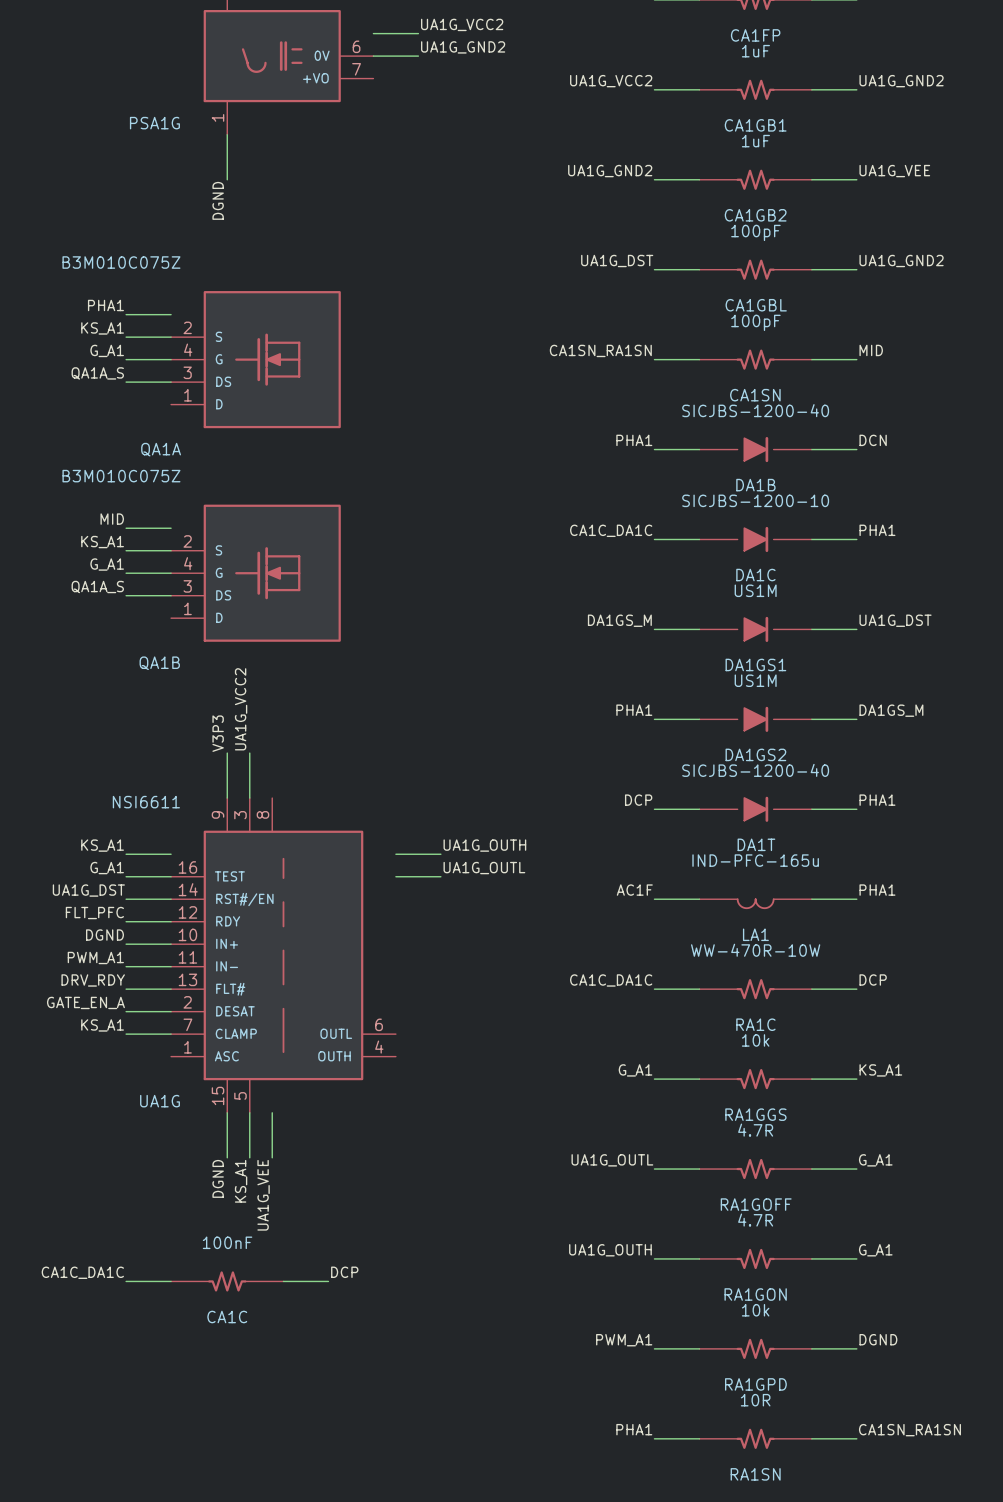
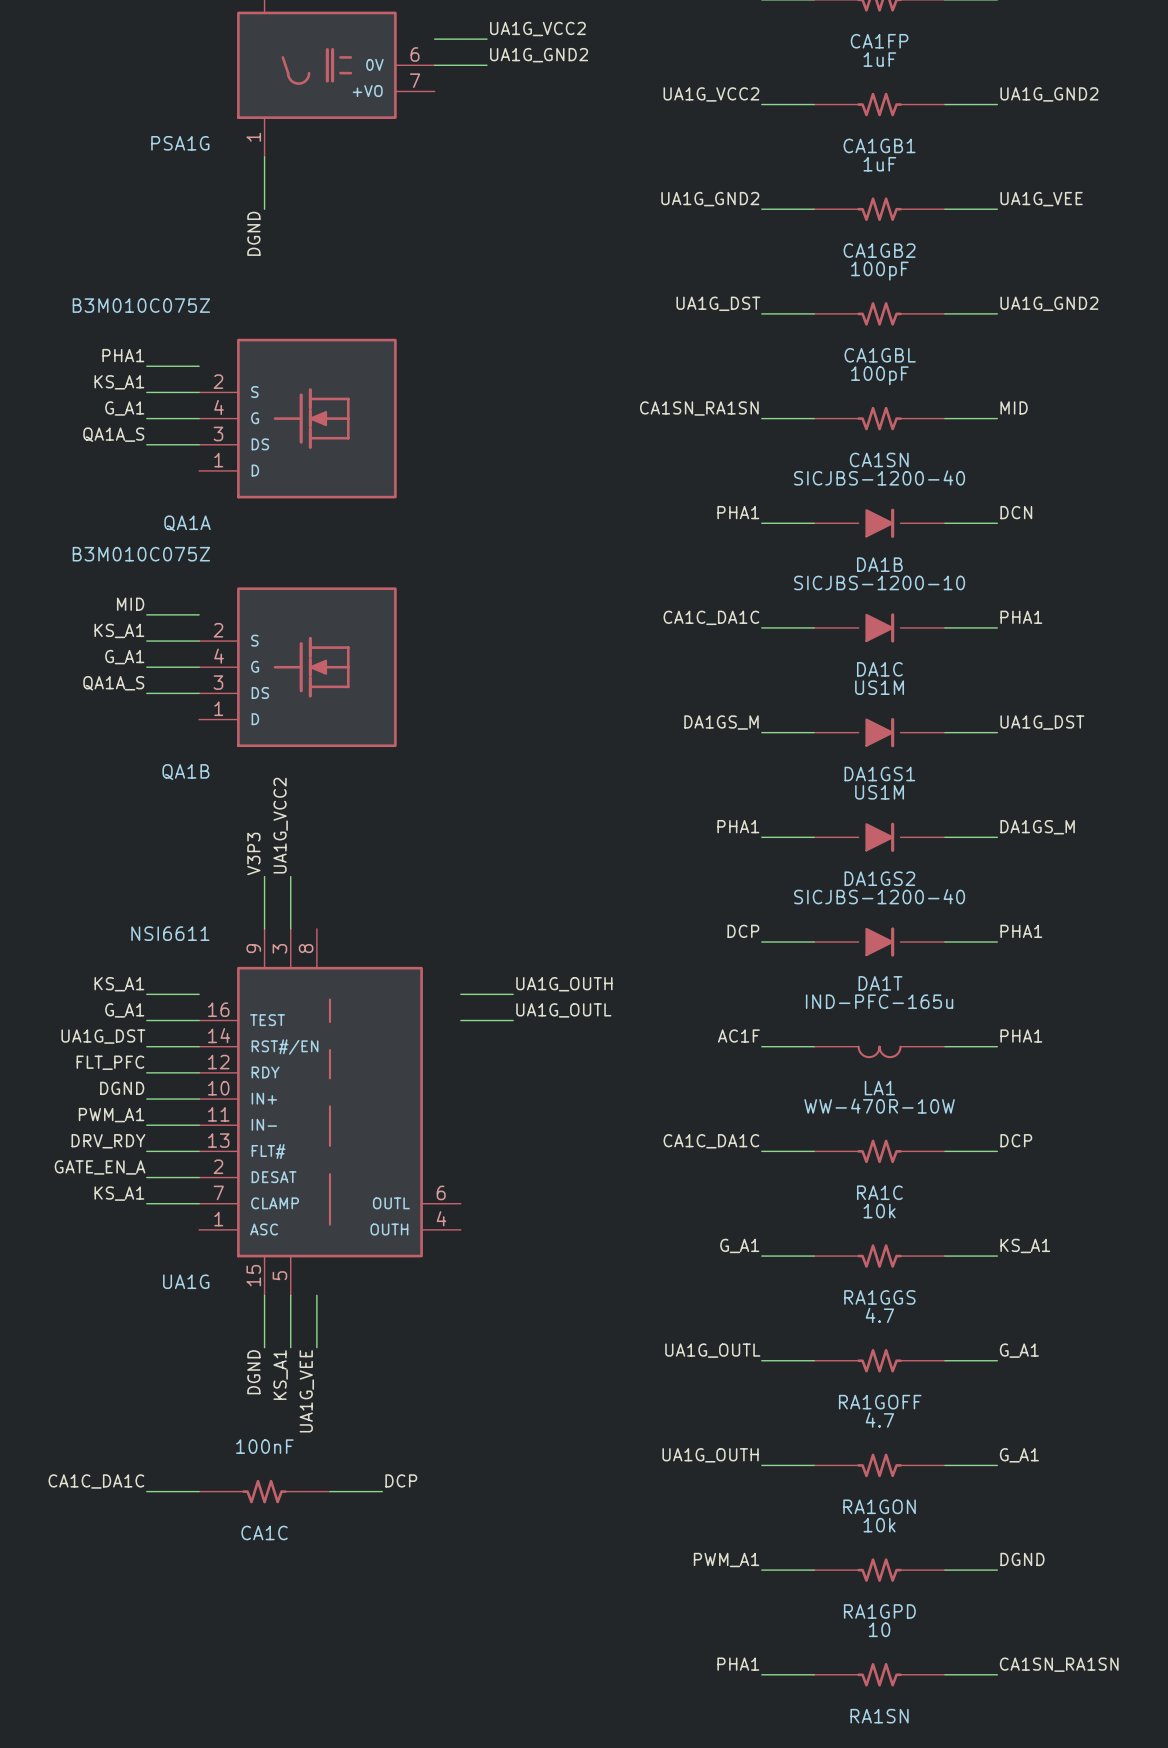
RA1GOFF value: 4.7R (755, 1130) -> 4.7 (879, 1315)
RA1GON value: 4.7R (755, 1220) -> 4.7 (879, 1420)
RA1SN value: 10R (755, 1400) -> 10 (879, 1629)

